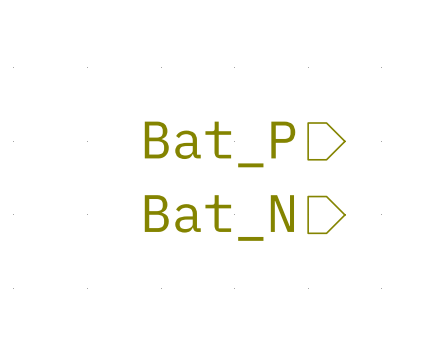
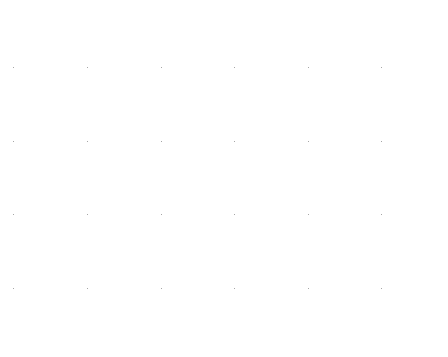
hierarchical label: Bat_P (220, 144) -> none
hierarchical label: Bat_N (219, 218) -> none

